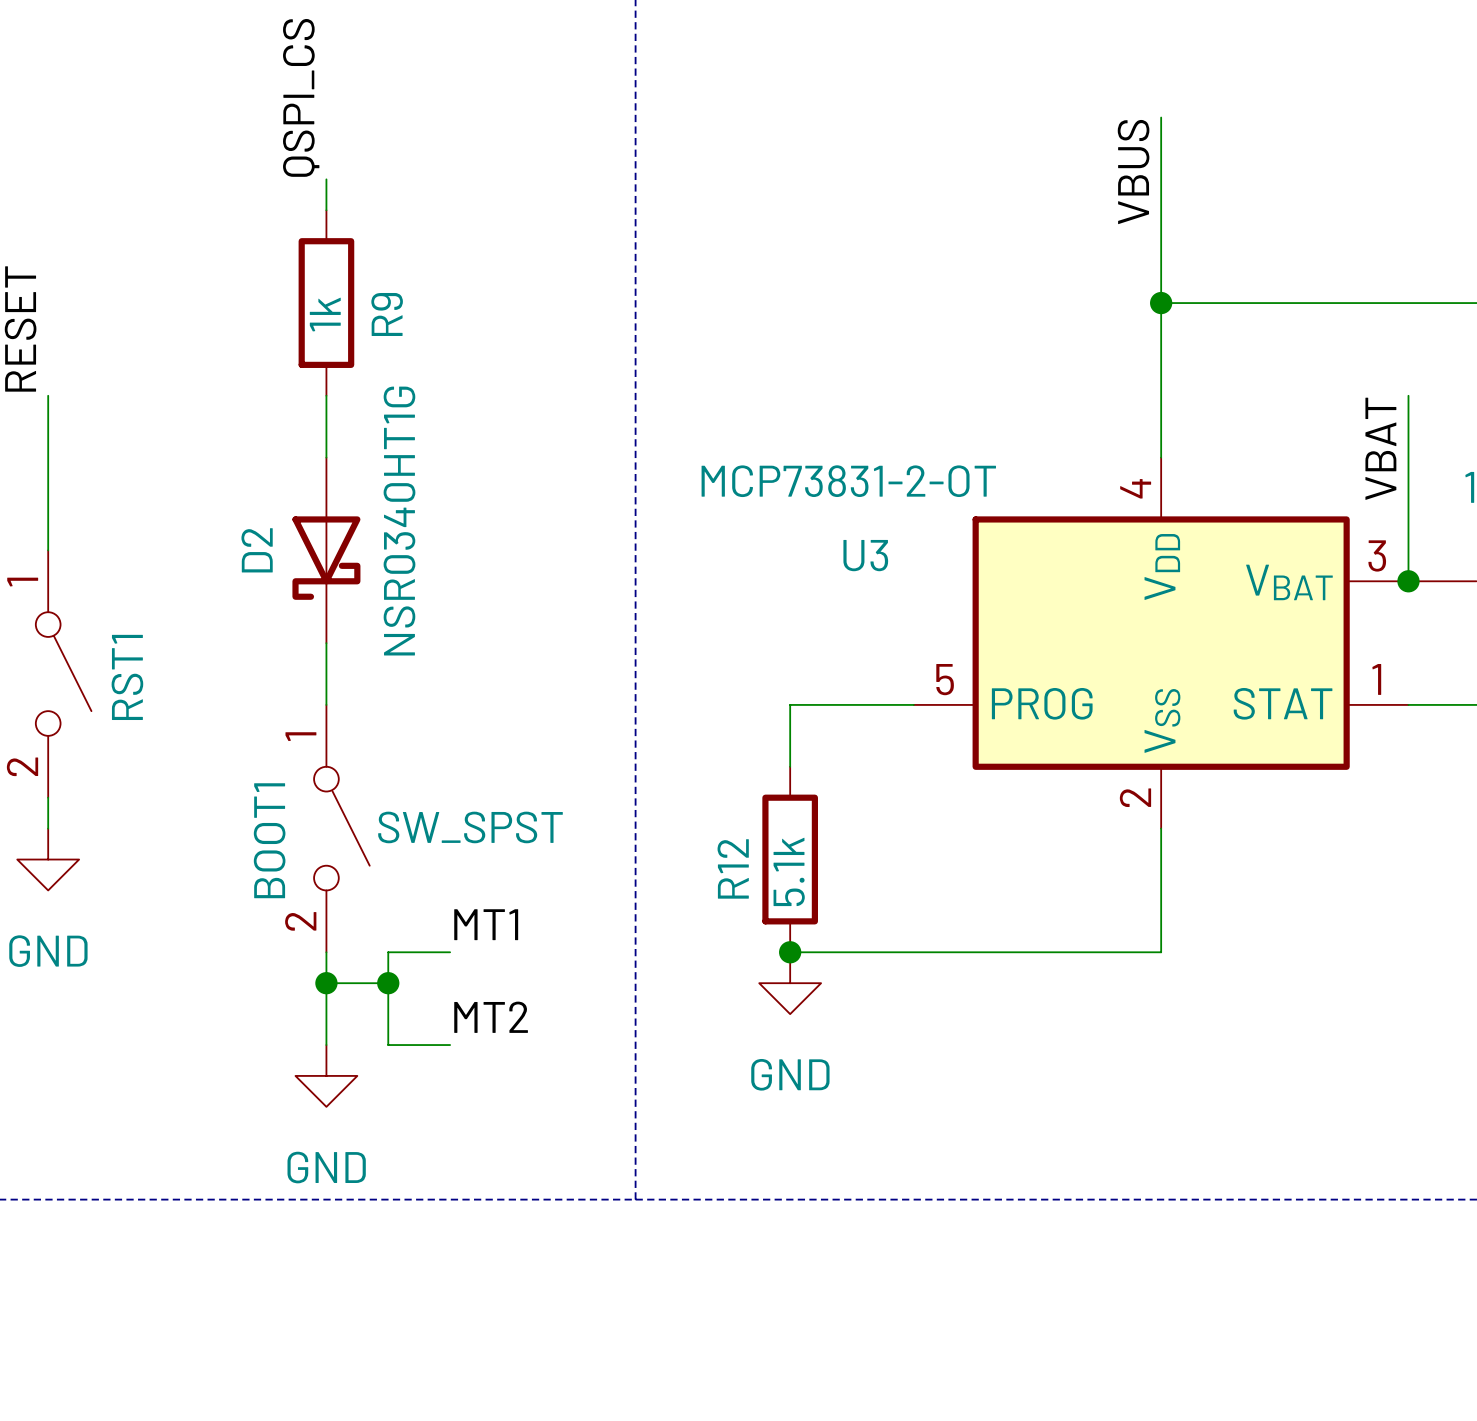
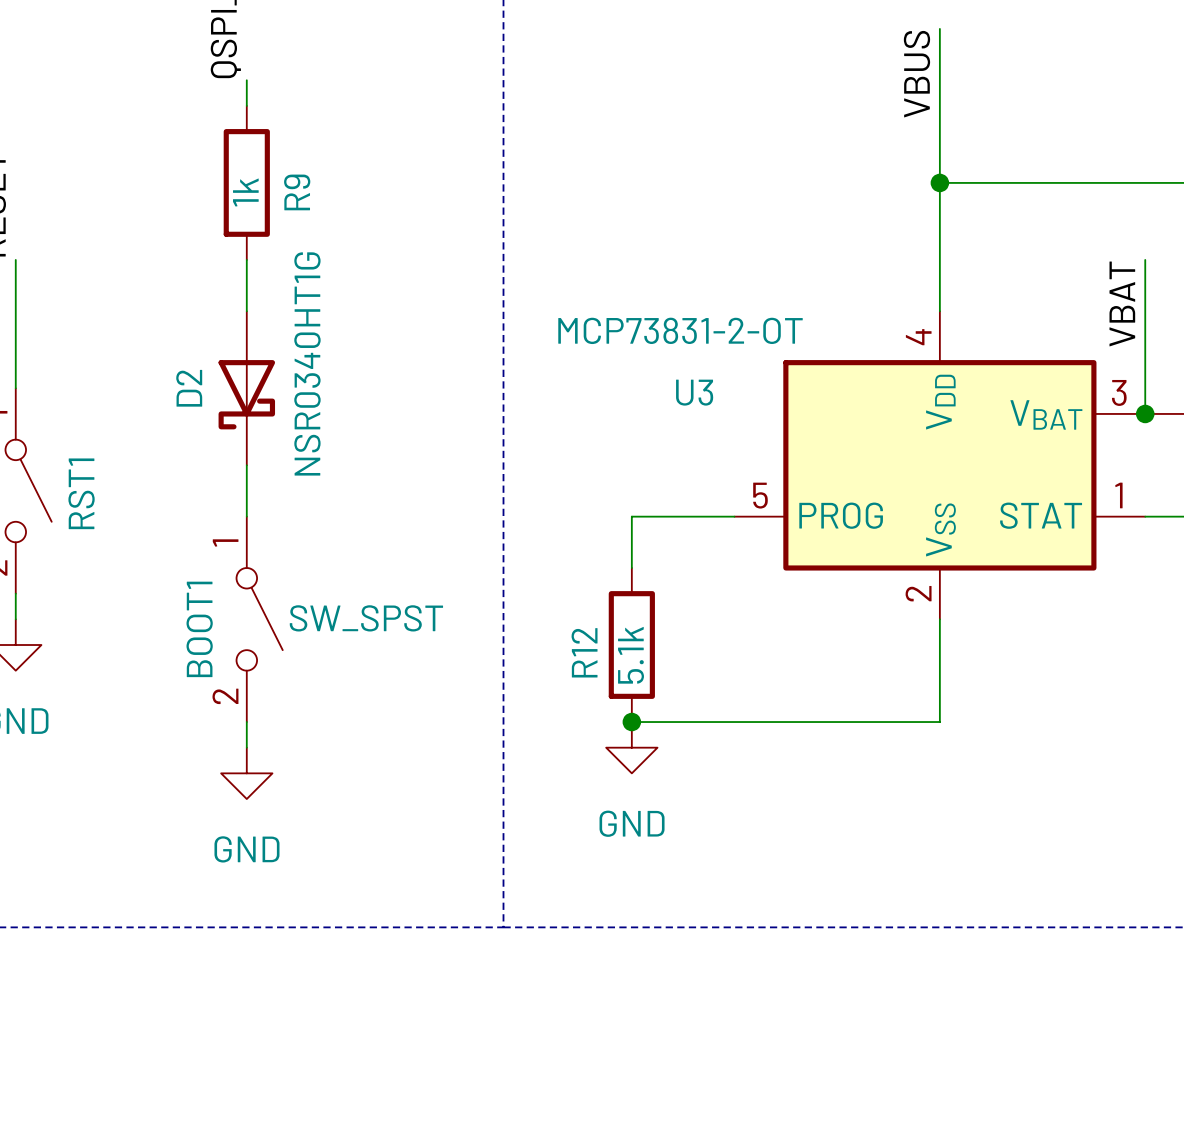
label: MT1 (486, 924) -> none
wire: (450, 952) (388, 952) (388, 1045) (450, 1045) -> none
junction: (326, 983) -> none
wire: (388, 983) (326, 983) (326, 1045) -> none
junction: (388, 983) -> none
label: MT2 (491, 1017) -> none
power symbol position: GND (326, 1075) -> GND (246, 773)

